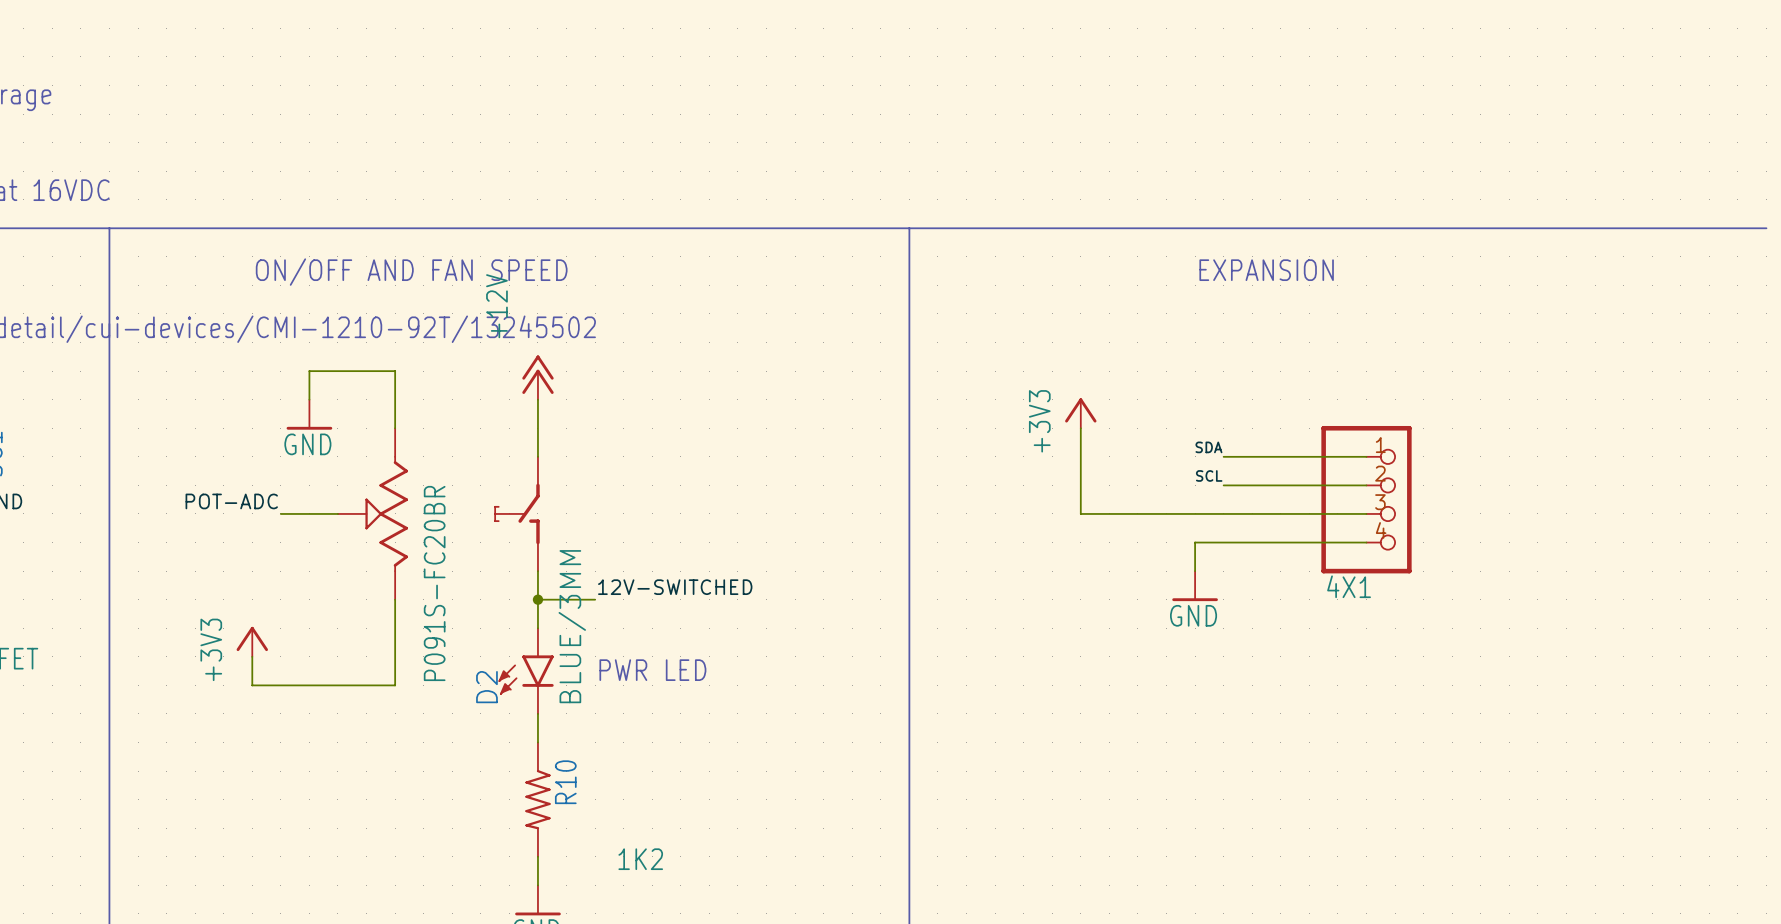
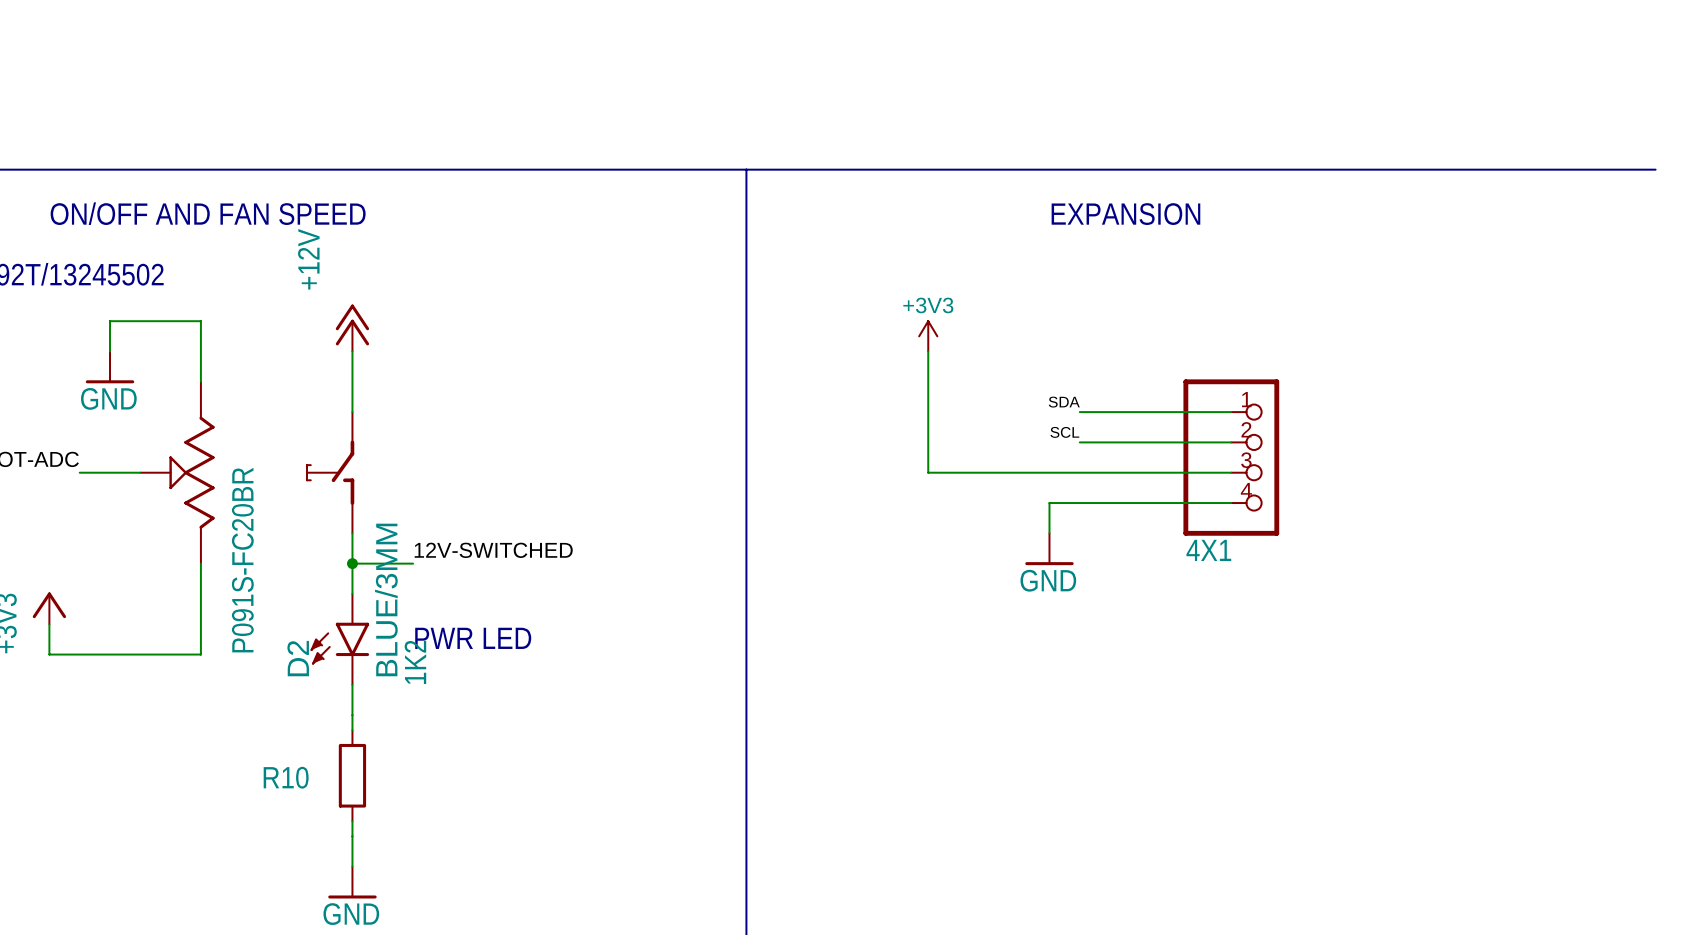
power symbol: none -> +3V3 (928, 336)
power symbol: +3V3 (1080, 413) -> none
R10 symbol: [525, 742, 551, 857] -> [338, 730, 367, 822]
R10 name position: R10 (565, 782) -> R10 (286, 777)
R10 value position: 1K2 (640, 859) -> 1K2 (415, 662)

